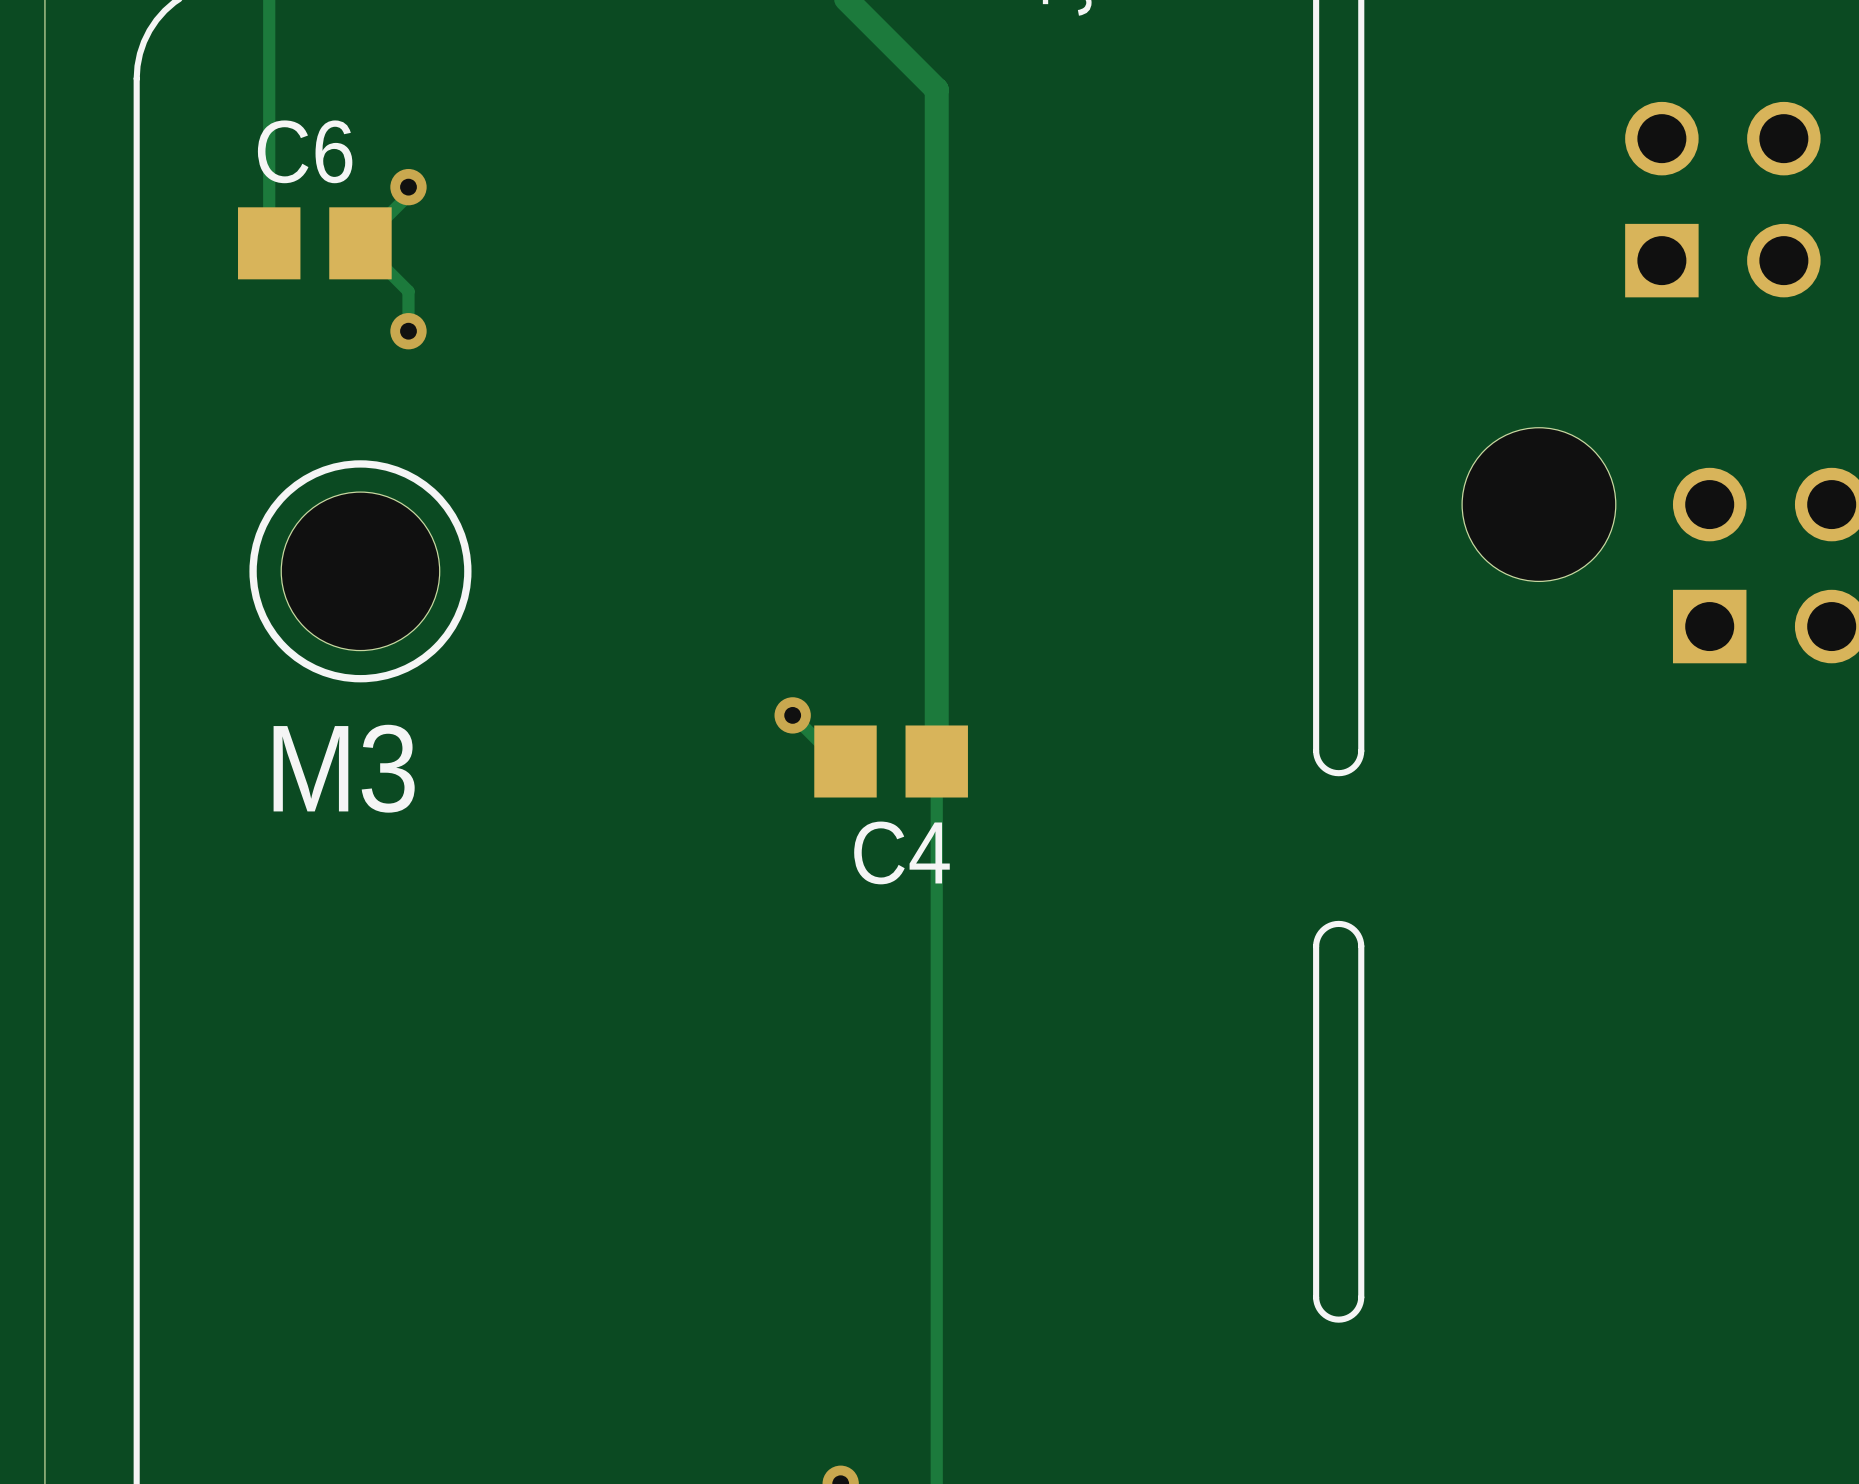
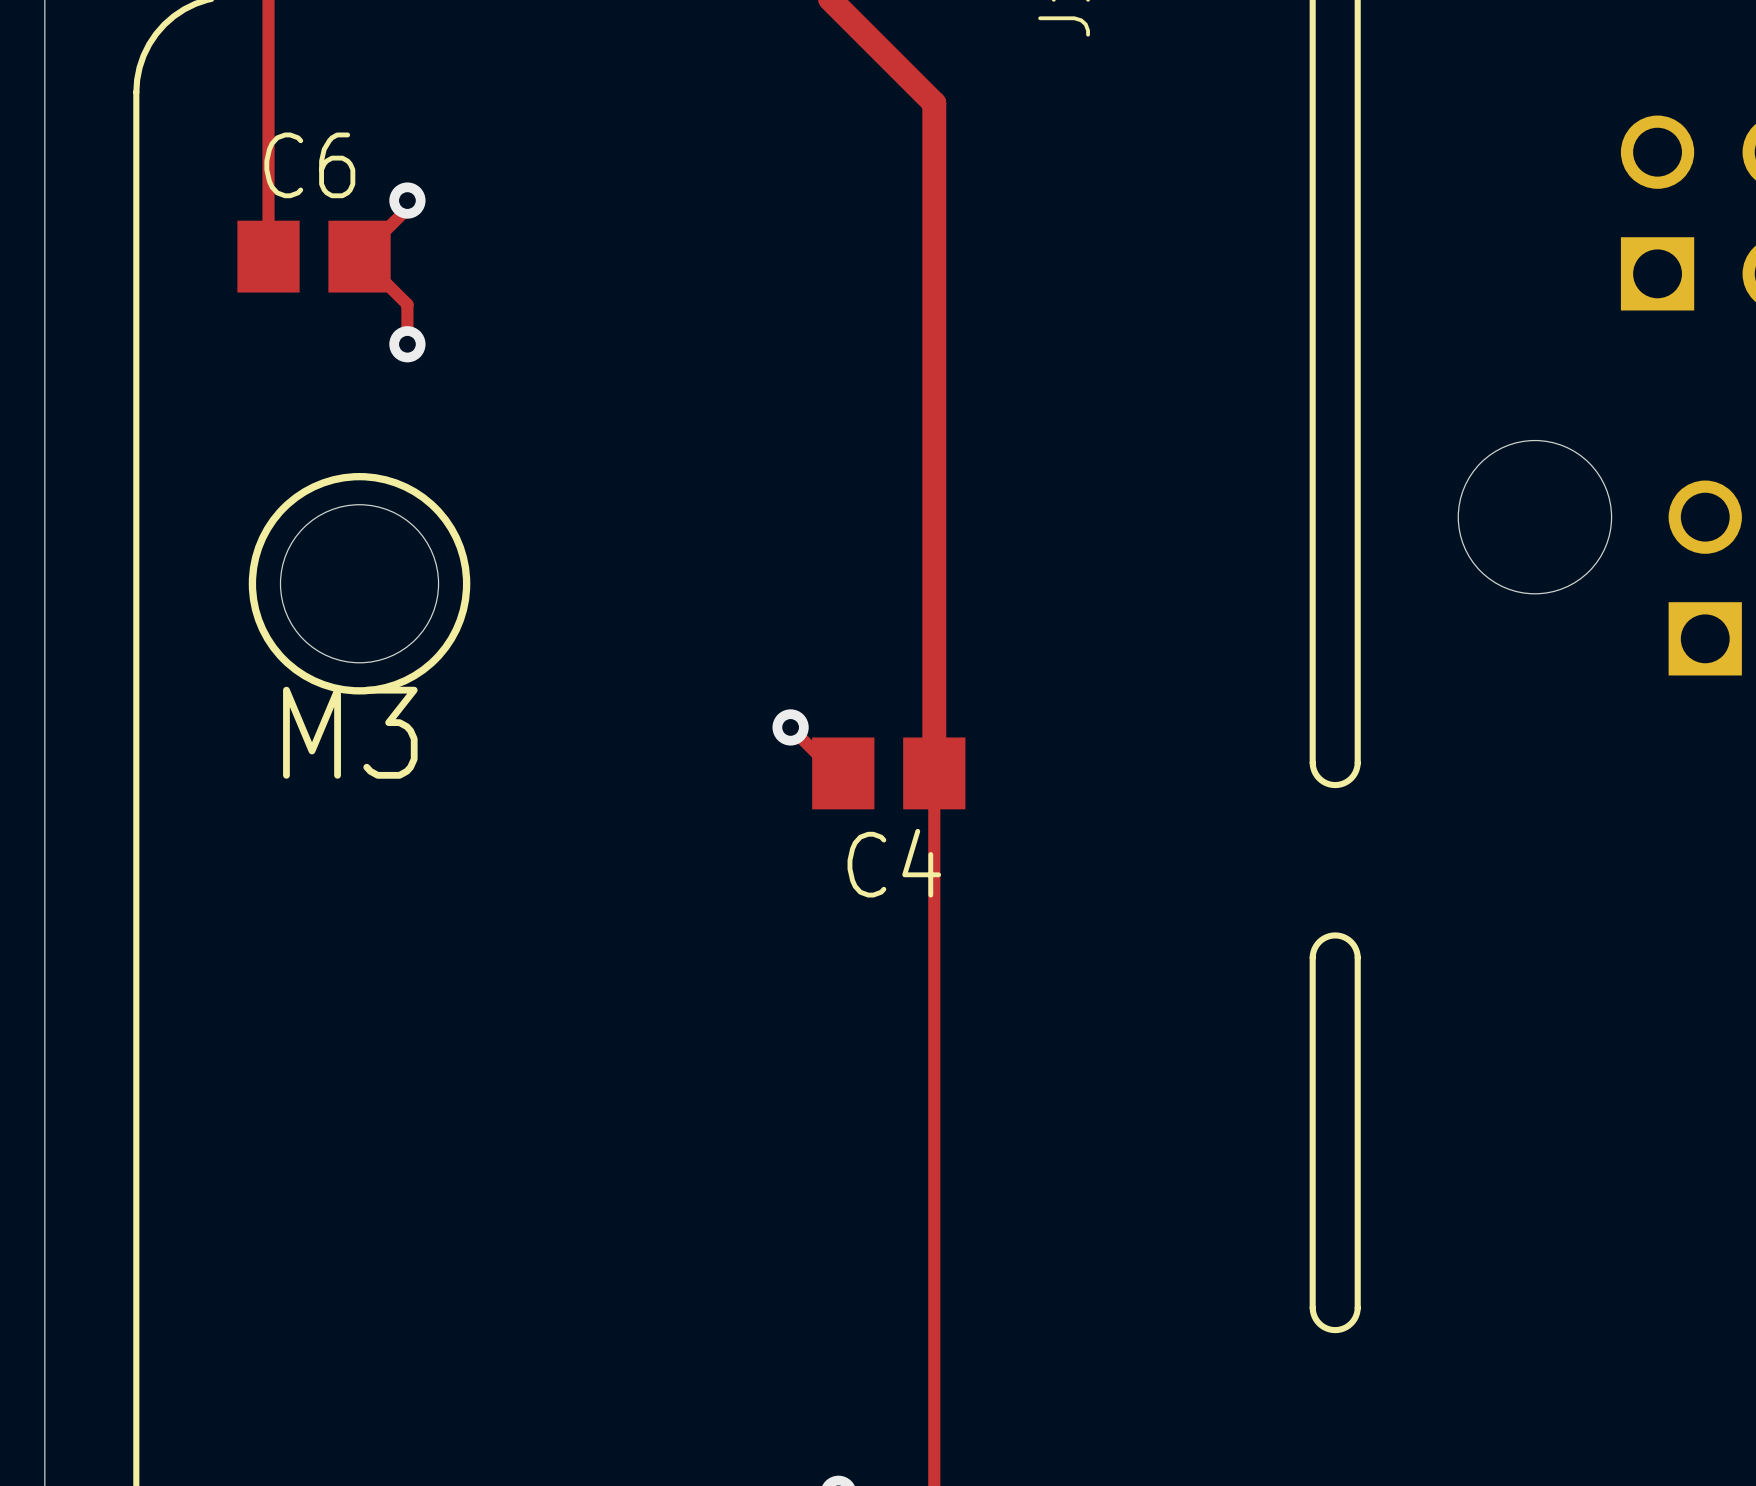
text position: M3 (344, 768) -> M3 (350, 732)

